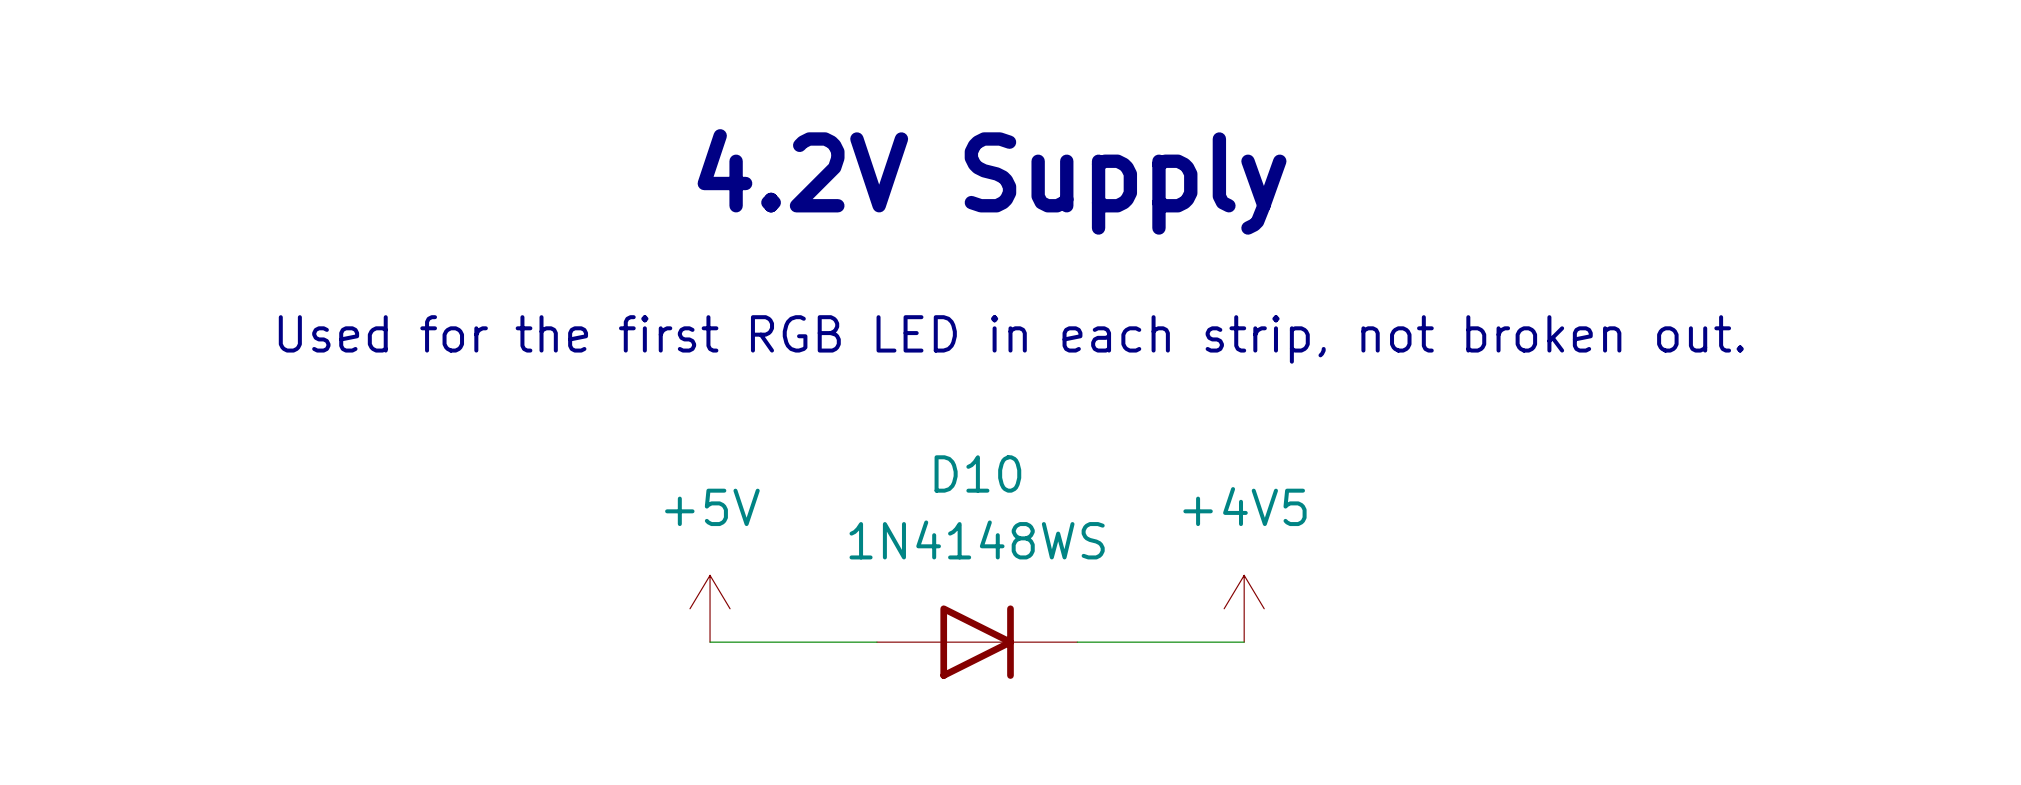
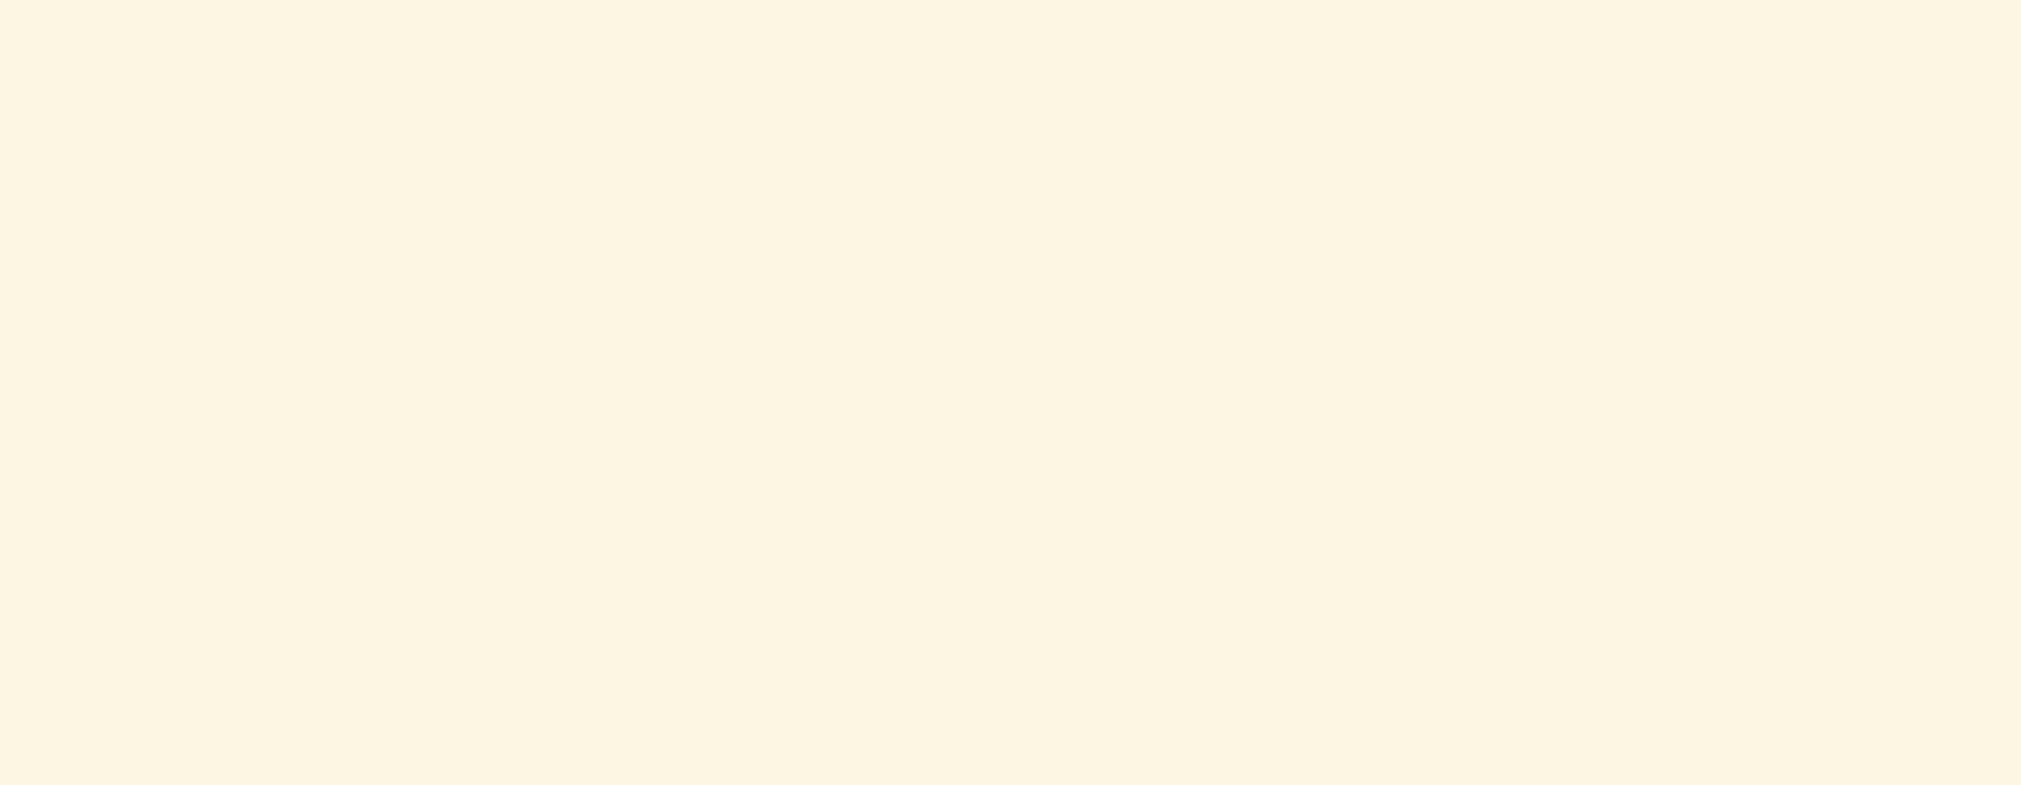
text: 4.2V Supply (992, 181) -> none
text: Used for the first RGB LED in each strip, not broken out. (1011, 339) -> none
power symbol: +5V (710, 608) -> none
power symbol: +4V5 (1244, 608) -> none
wire: (710, 642) (876, 642) -> none
D10: 1N4148WS (977, 642) -> none
wire: (1077, 642) (1244, 642) -> none

